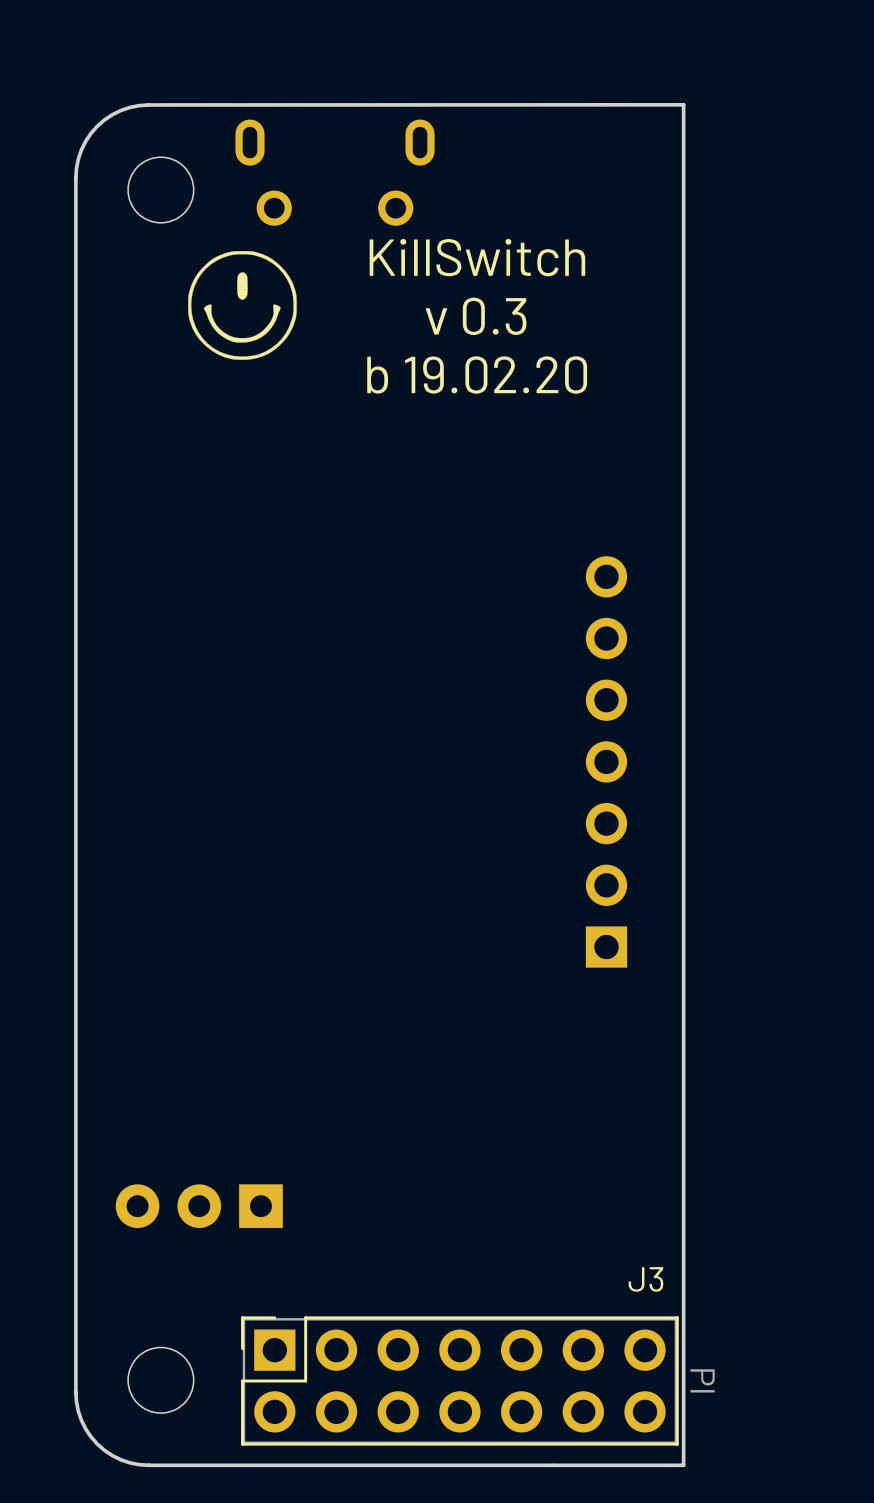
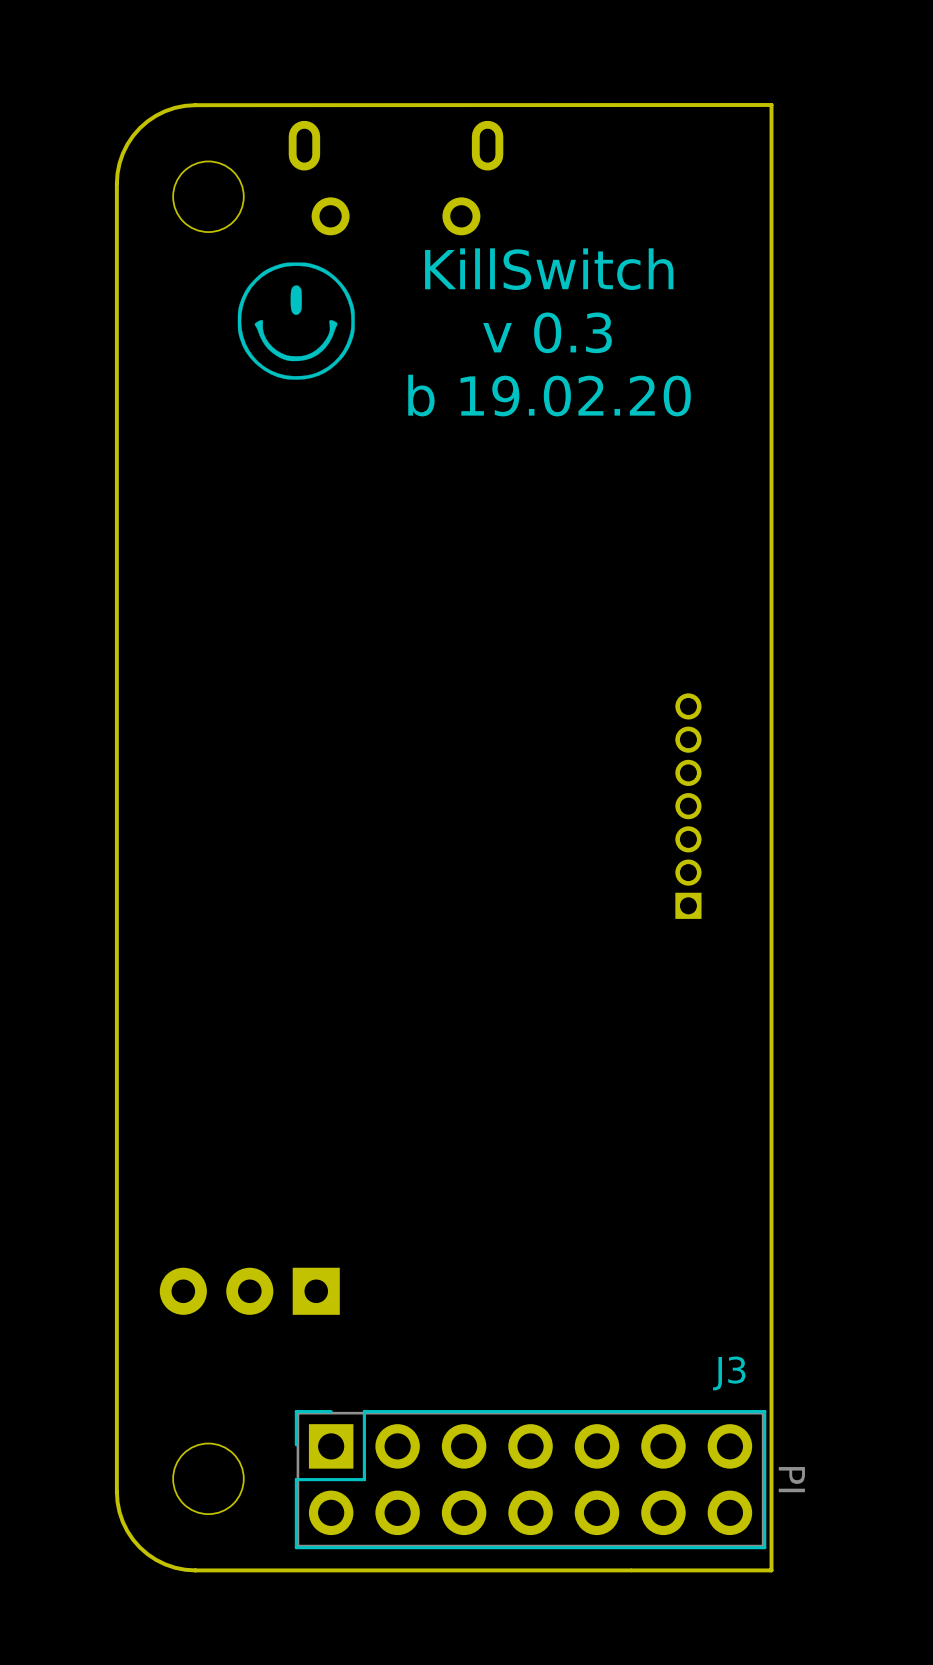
part footprint: [585, 556, 628, 968] -> [675, 693, 702, 919]

